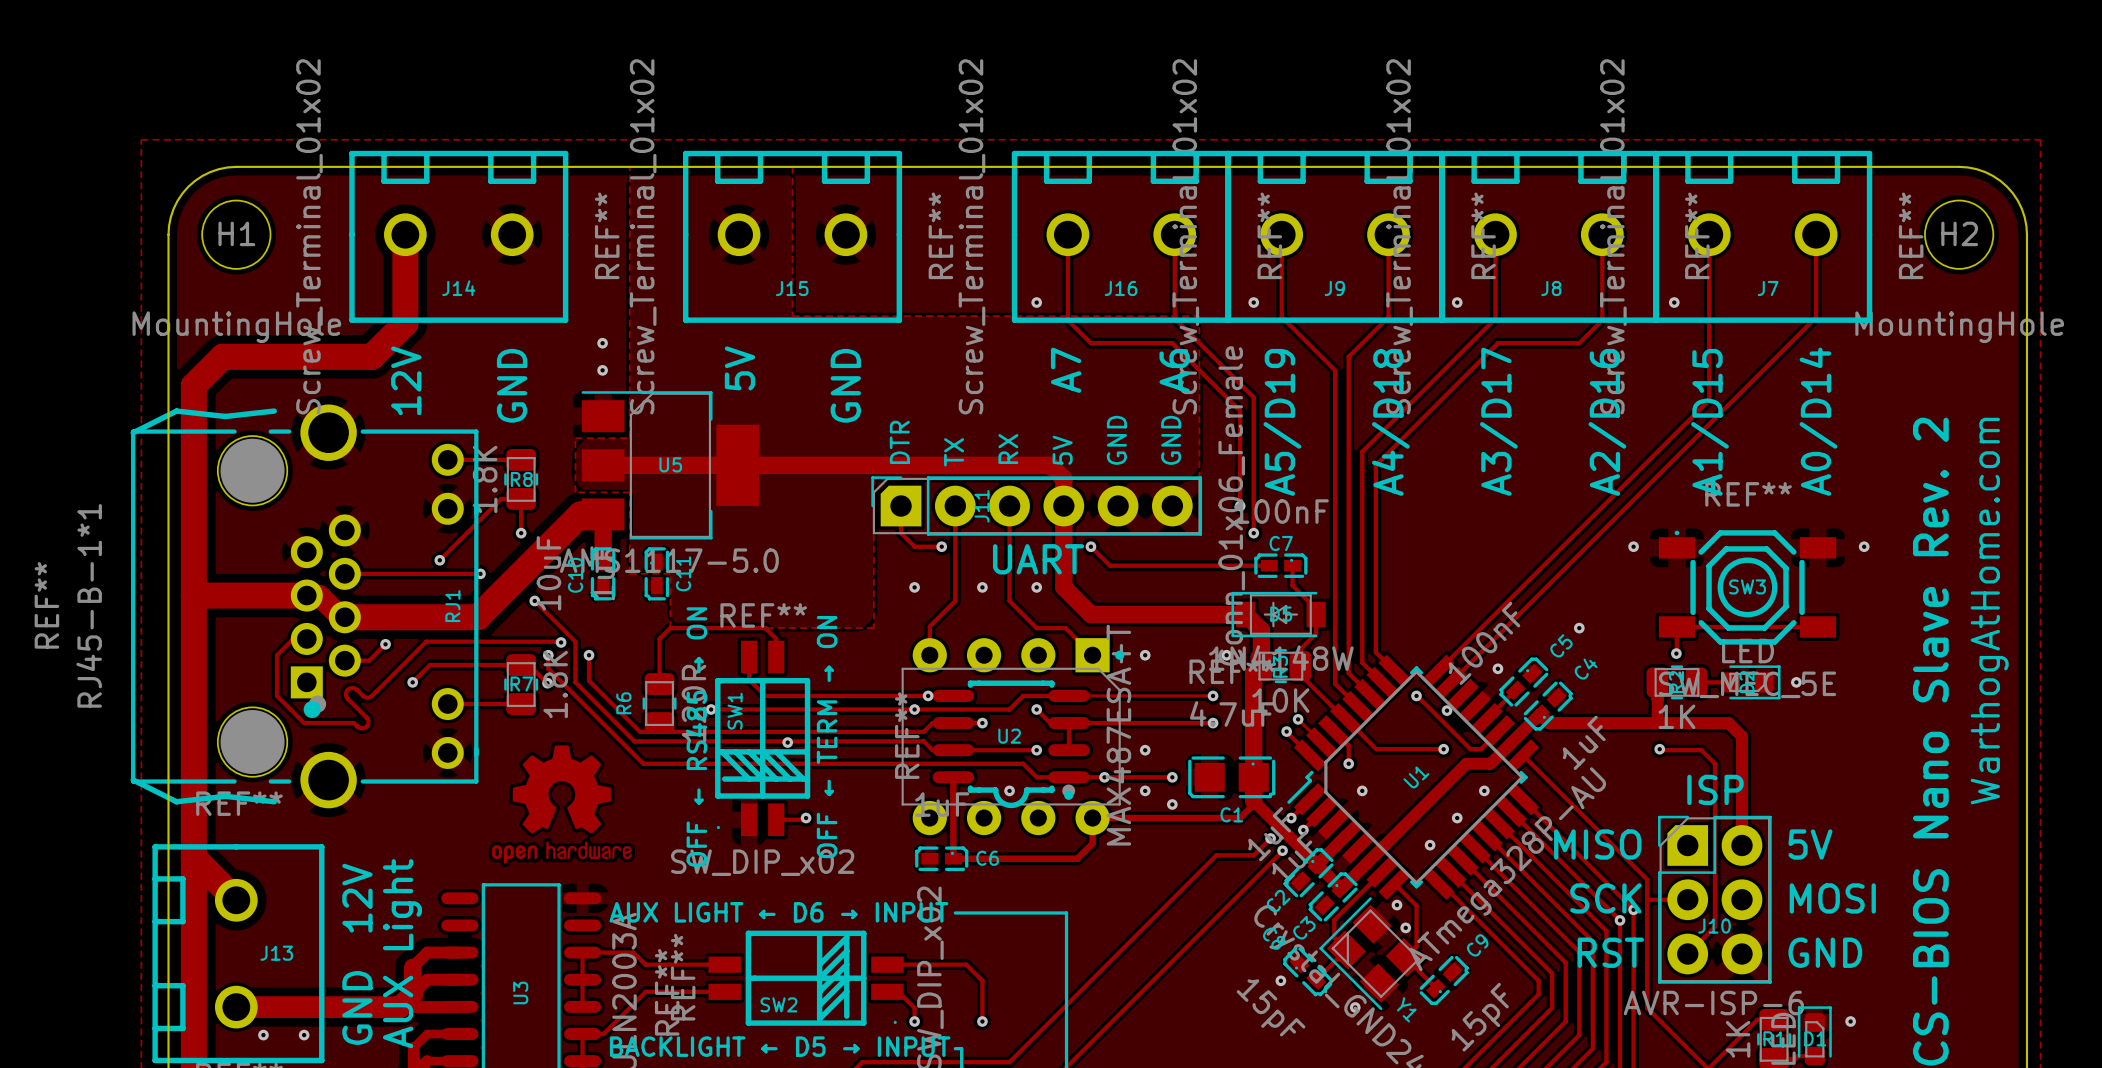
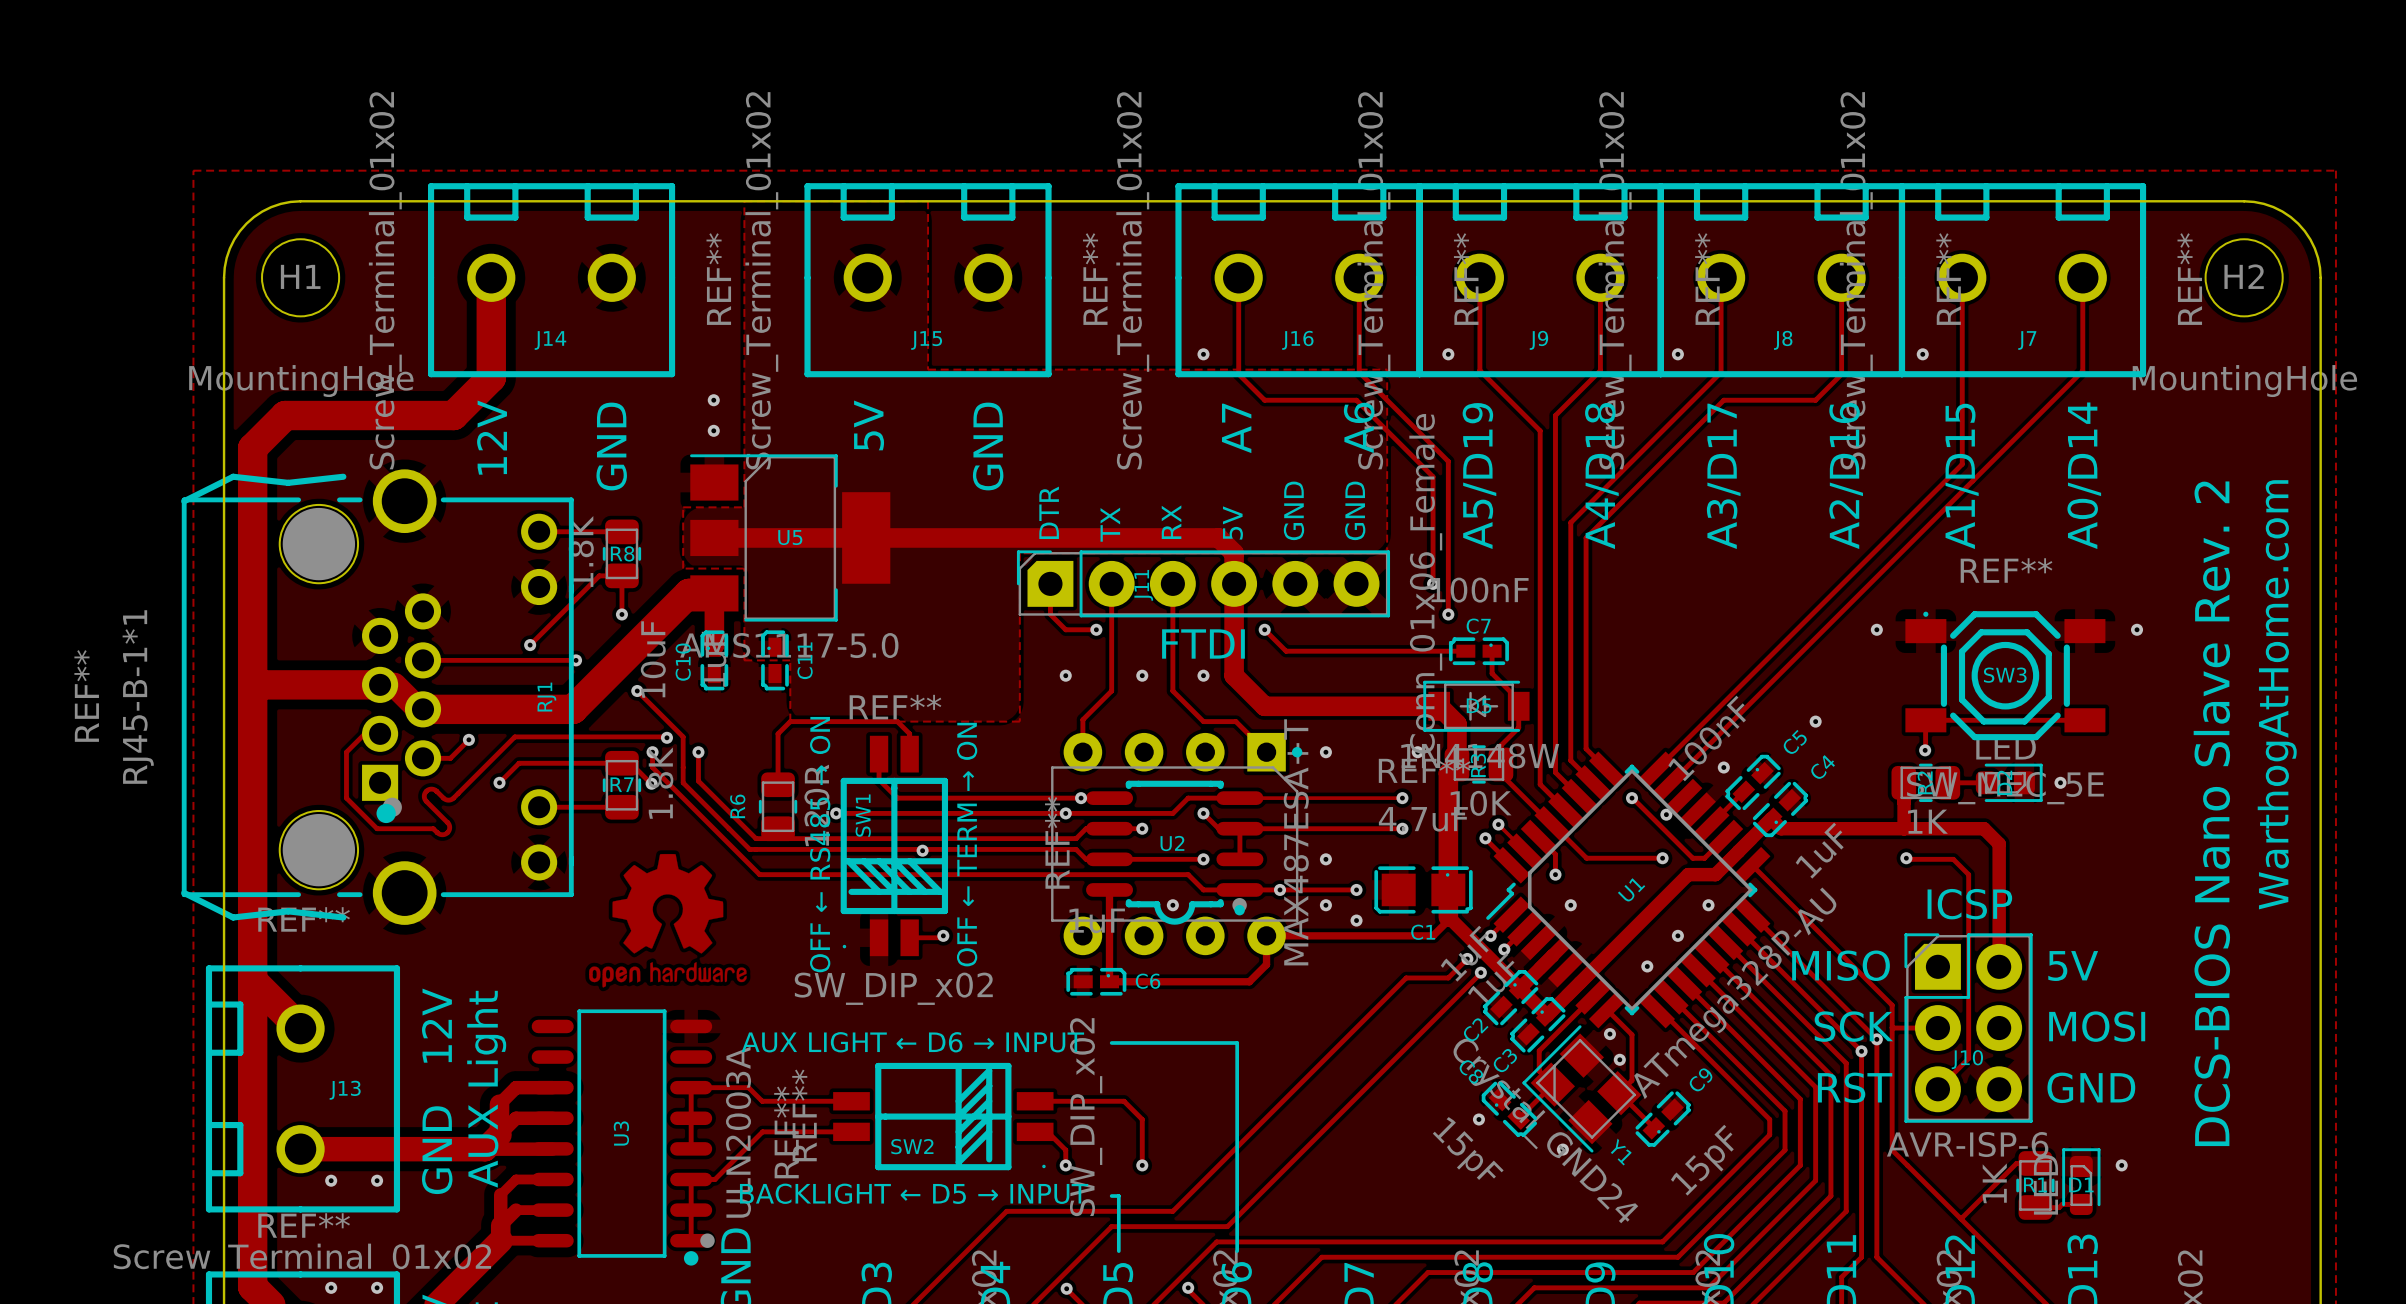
J11 text: UART (1038, 559) -> FTDI (1203, 643)
J10 text: ISP (1715, 789) -> ICSP (1969, 904)

